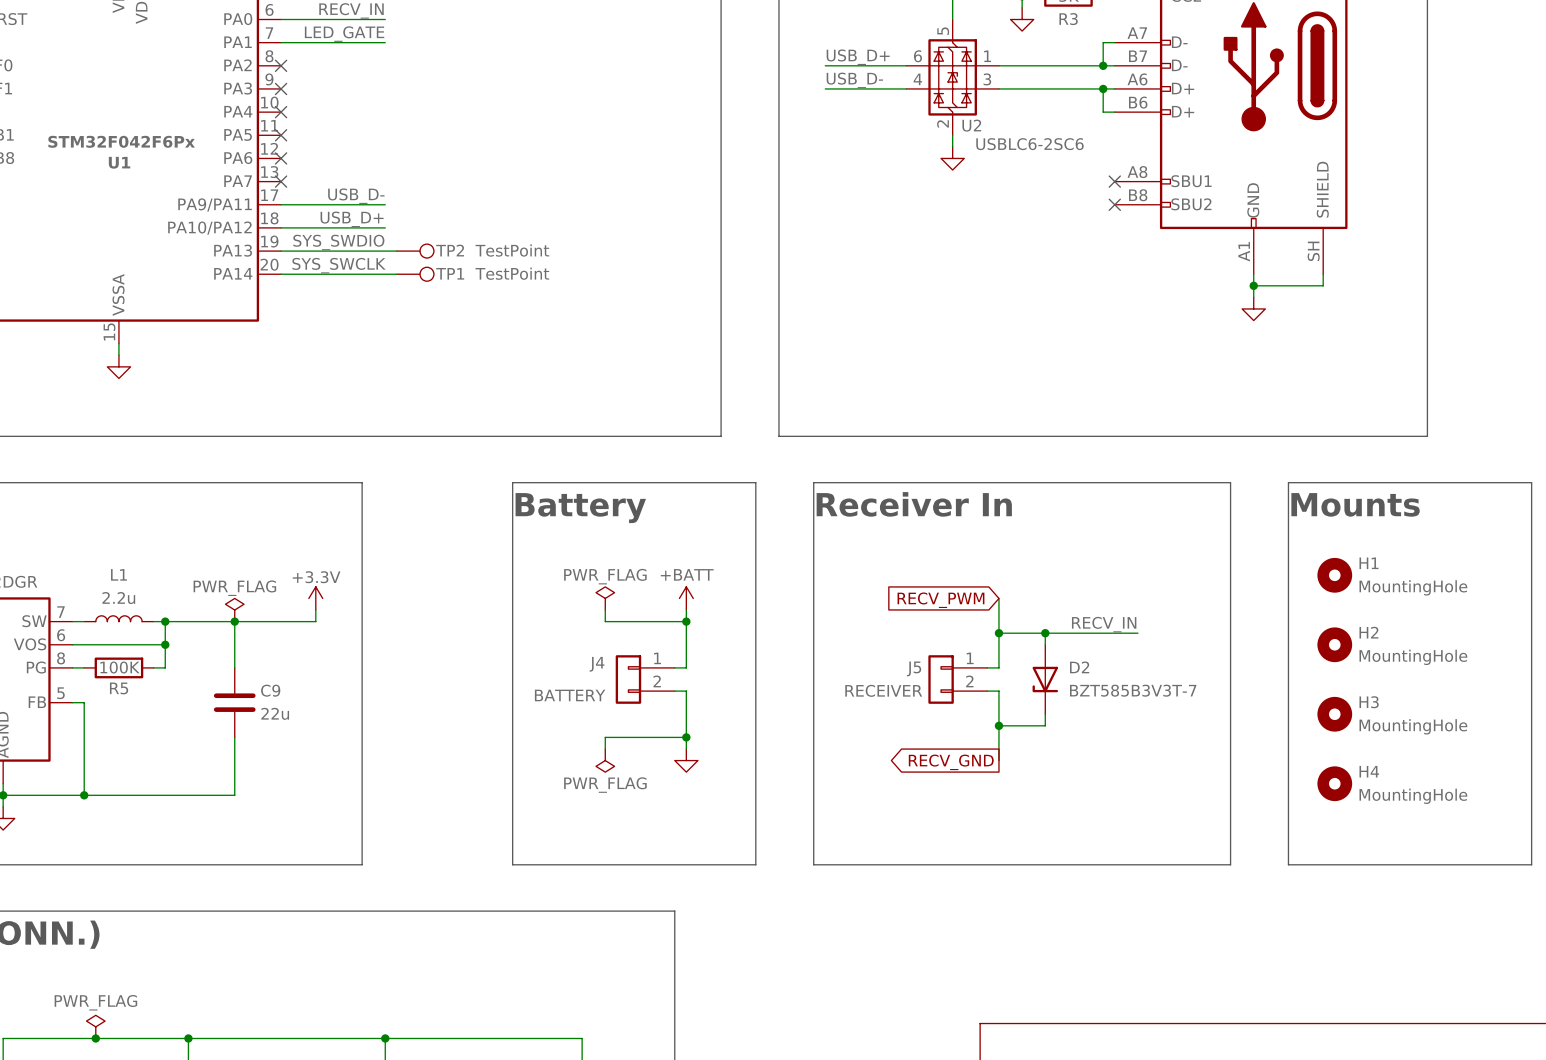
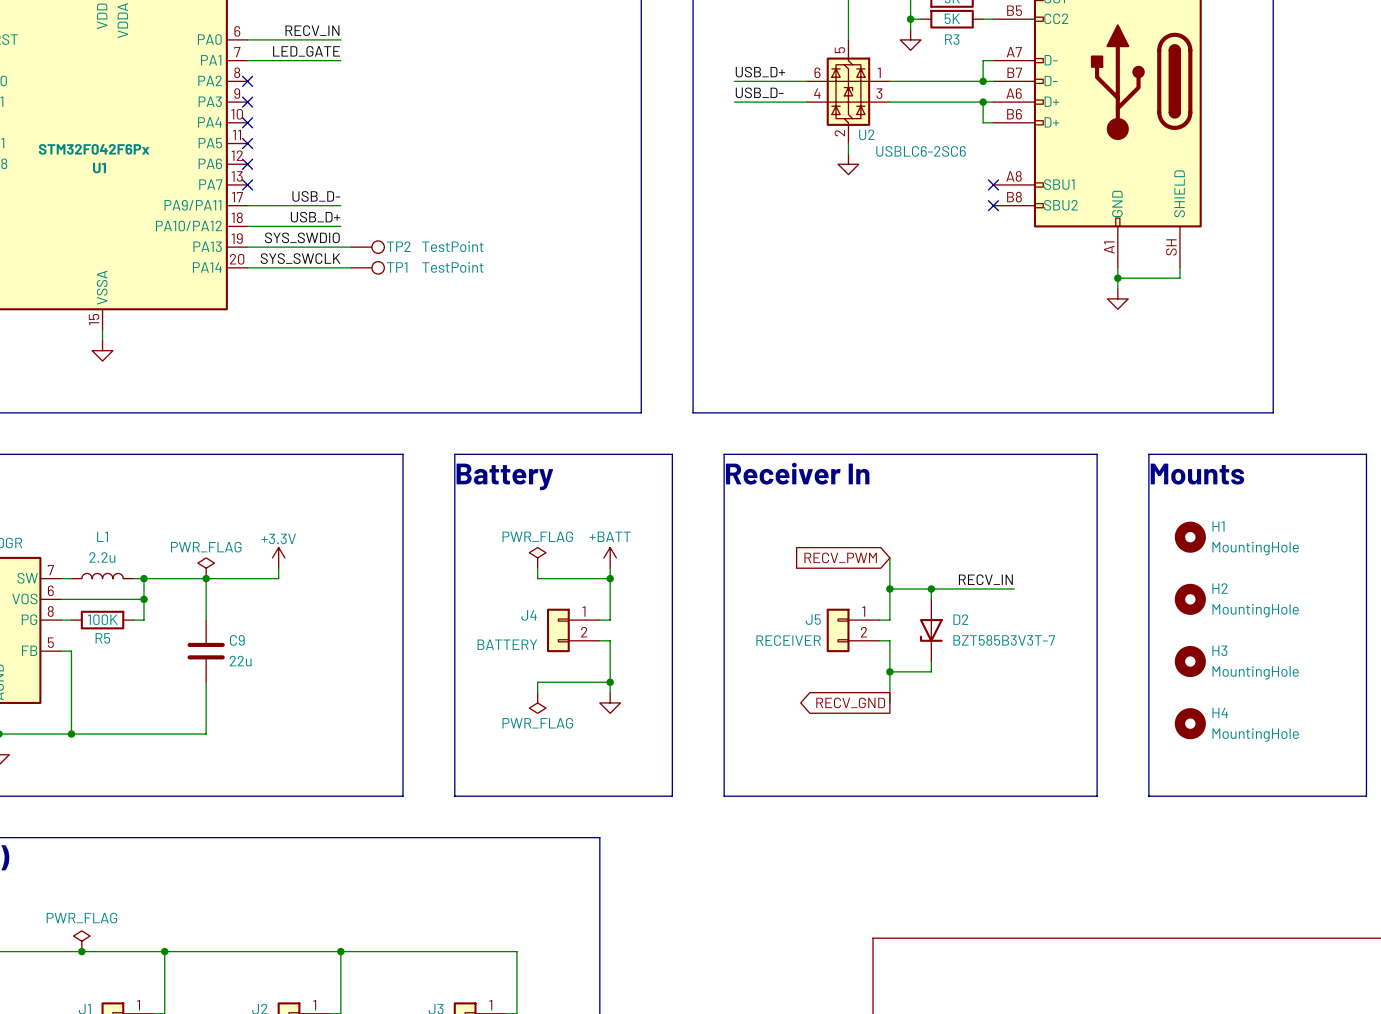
line: (362, 482) (362, 864) -> (320, 454) (402, 454) (402, 796) (320, 796)

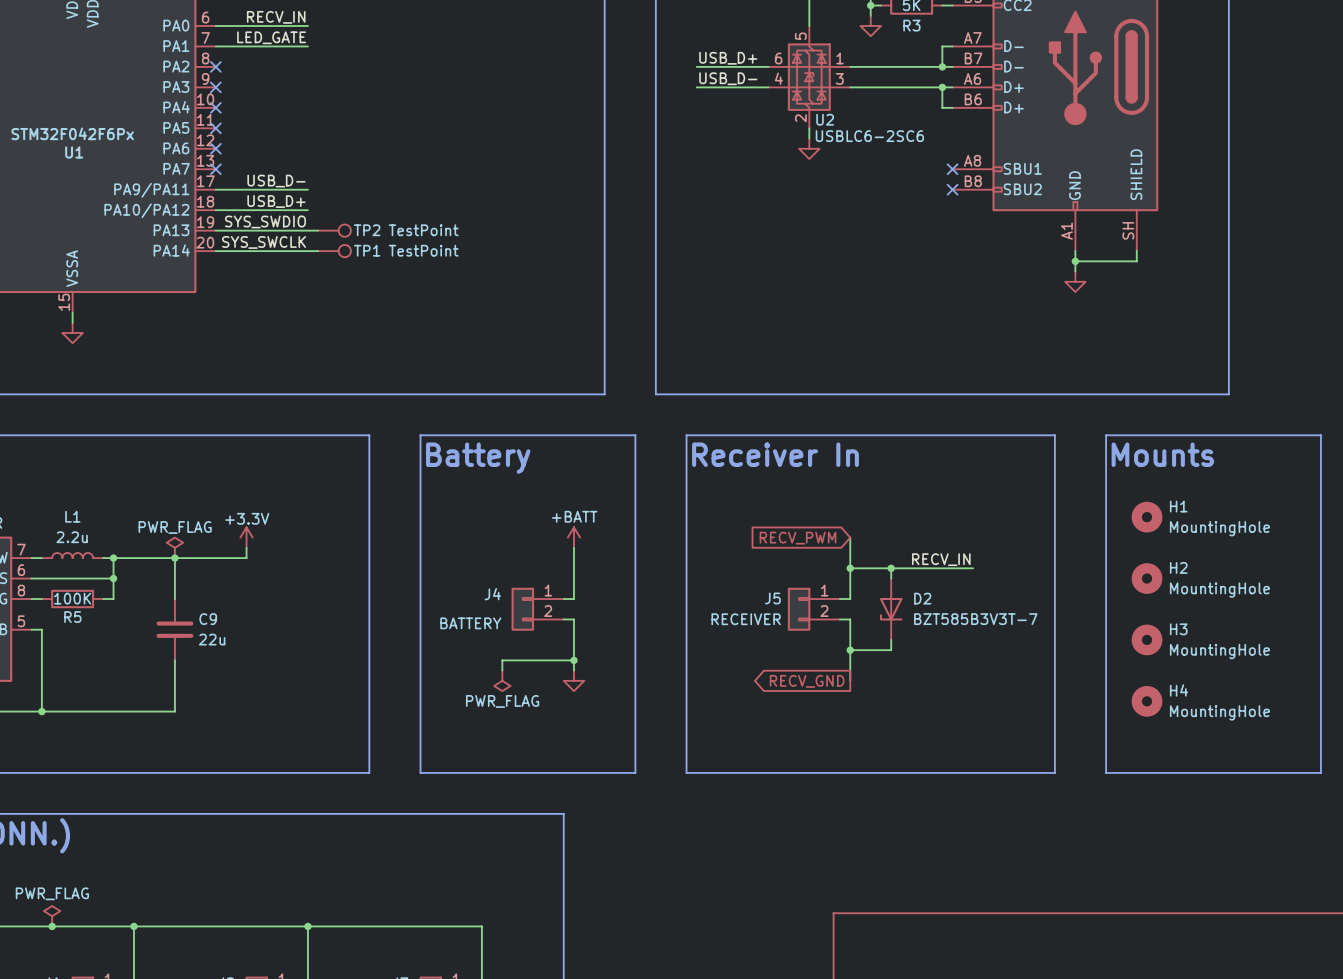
power symbol: PWR_FLAG (537, 557) -> none
wire: (537, 568) (537, 578) (610, 578) -> none
junction: (610, 578) -> none

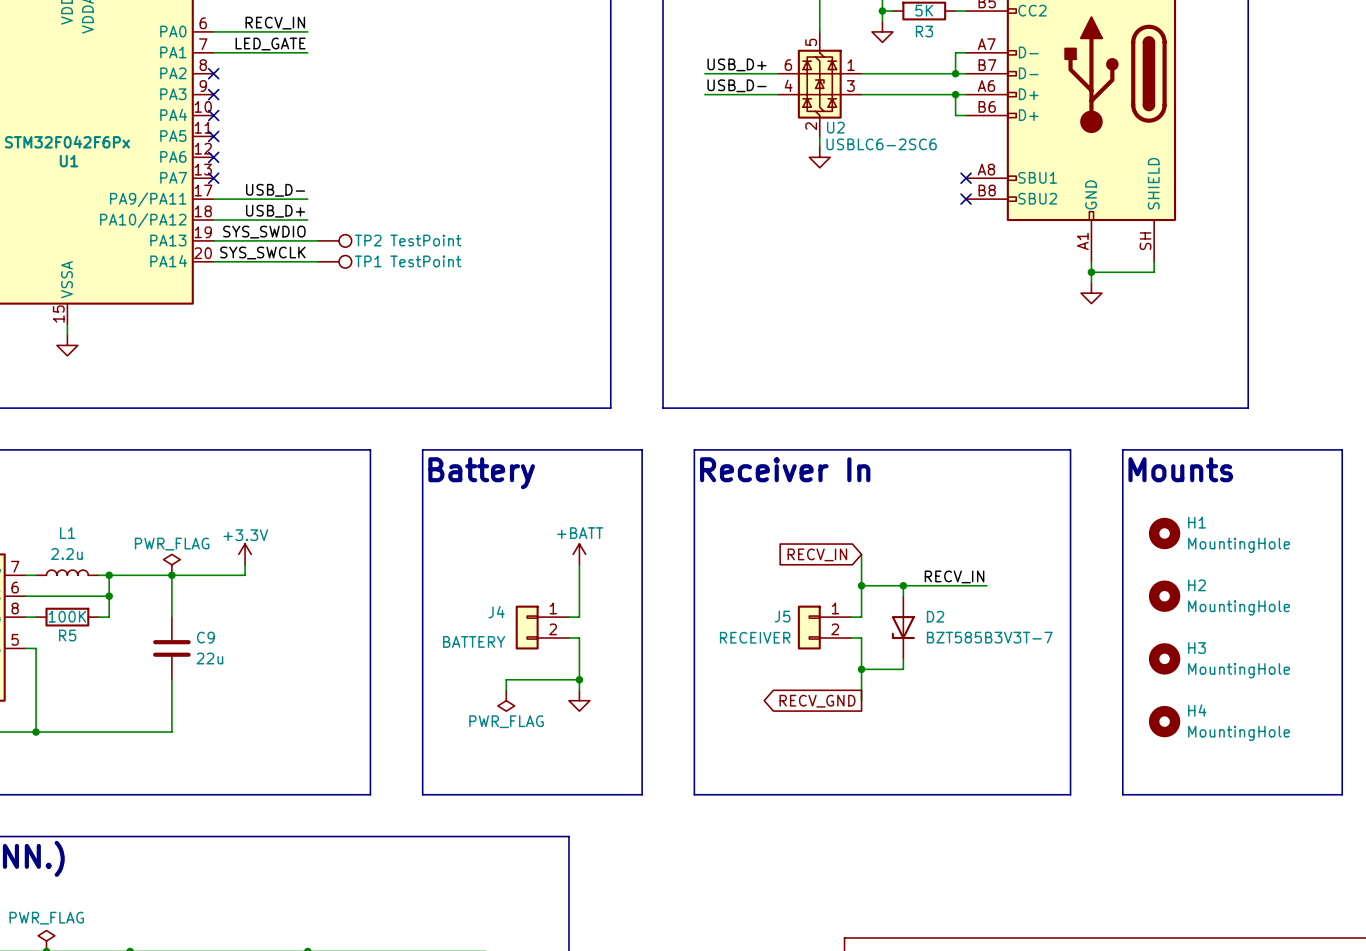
global label: RECV_PWM (797, 538) -> RECV_IN (817, 554)

